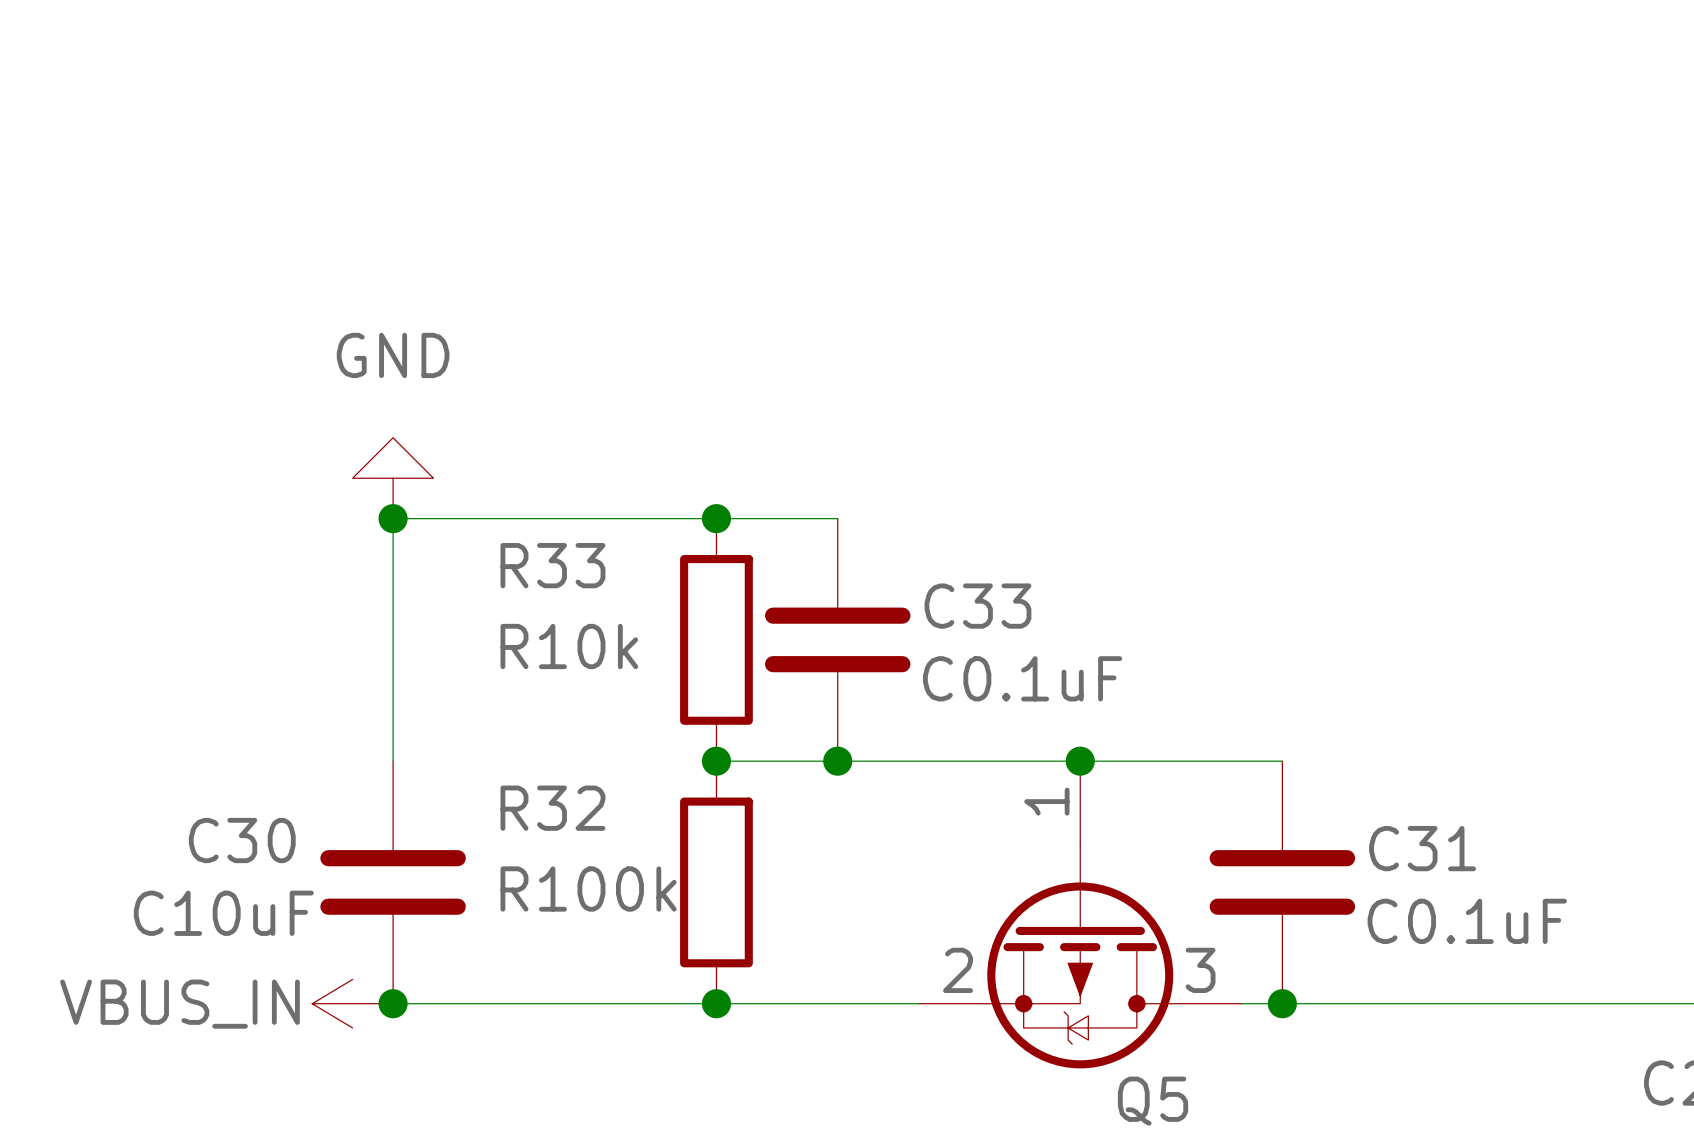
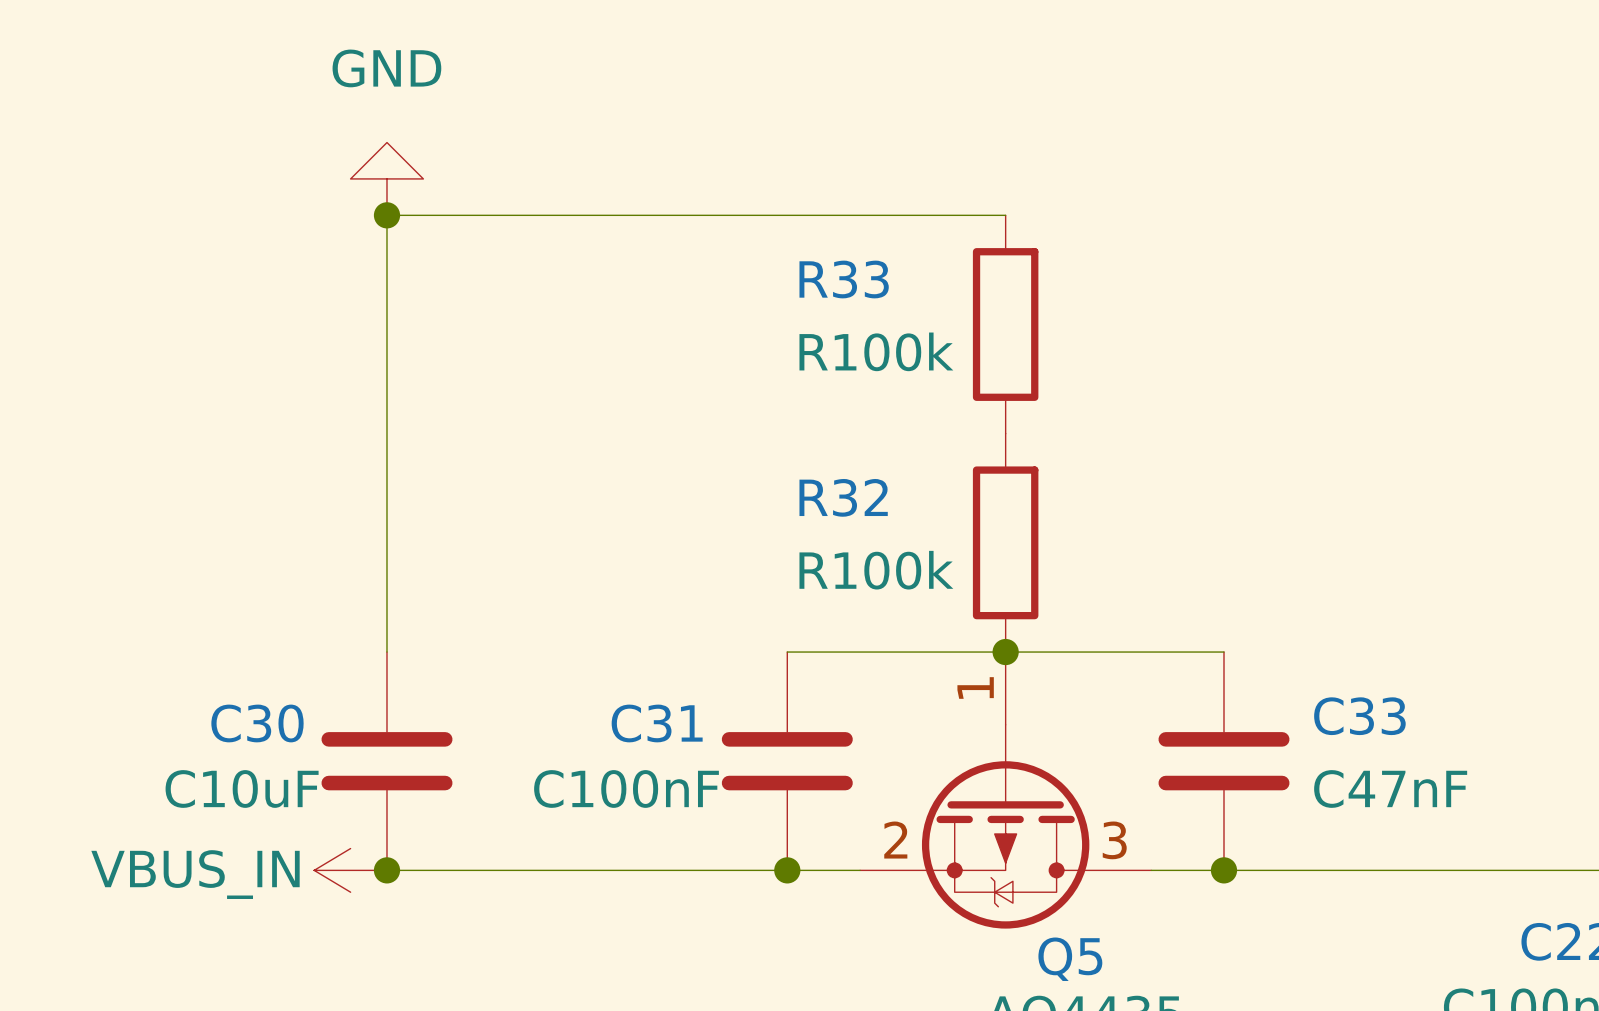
junction: none -> (386, 215)
power symbol position: GND (393, 478) -> GND (386, 178)
wire: (393, 518) (837, 518) -> (386, 433) (386, 215) (1005, 215)
junction: (393, 518) -> none
junction: (716, 518) -> none
R33 name position: R33 (552, 565) -> R33 (844, 279)
C33 name position: C33 (977, 606) -> C33 (1359, 716)
R33 position: (716, 639) -> (1005, 324)
C33 position: (837, 639) -> (1223, 761)
R33 value: R10k (569, 646) -> R100k (876, 351)
C33 value: C0.1uF (1022, 678) -> C47nF (1390, 788)
wire: (716, 761) (837, 761) -> none
junction: (716, 761) -> none
junction: (837, 761) -> none
wire: none -> (1187, 652) (1223, 652)
R32 name position: R32 (552, 808) -> R32 (843, 497)
C31 name position: C31 (1422, 848) -> C31 (657, 723)
R32 position: (716, 882) -> (1005, 542)
C31 position: (1282, 882) -> (787, 761)
R32 value position: R100k (588, 889) -> R100k (876, 570)
C31 value: C0.1uF (1467, 921) -> C100nF (626, 788)
junction: (716, 1003) -> none
junction: none -> (787, 870)
junction position: (1282, 1003) -> (1223, 870)

